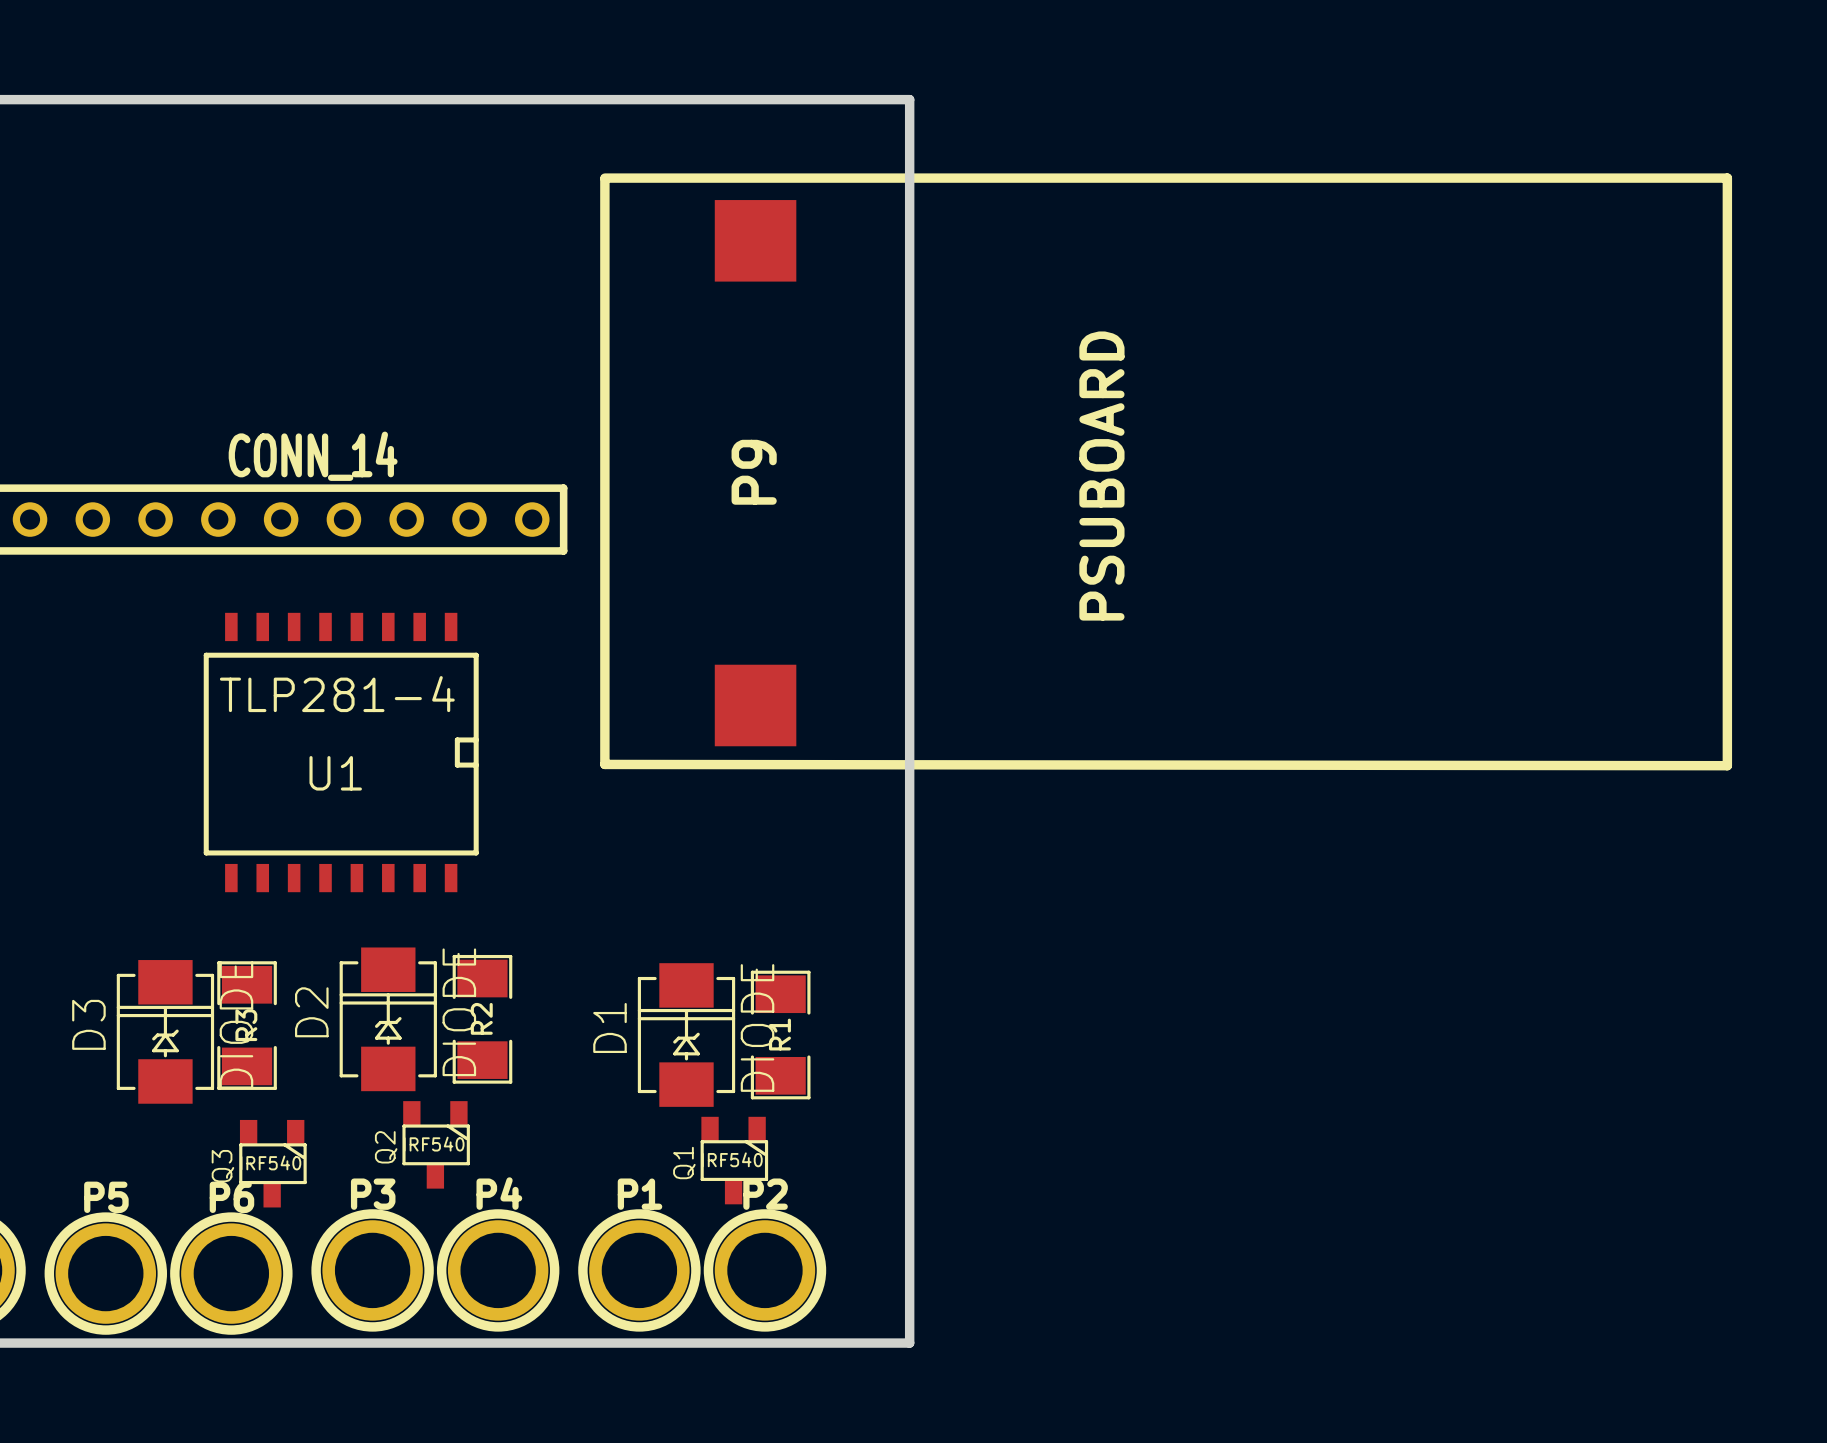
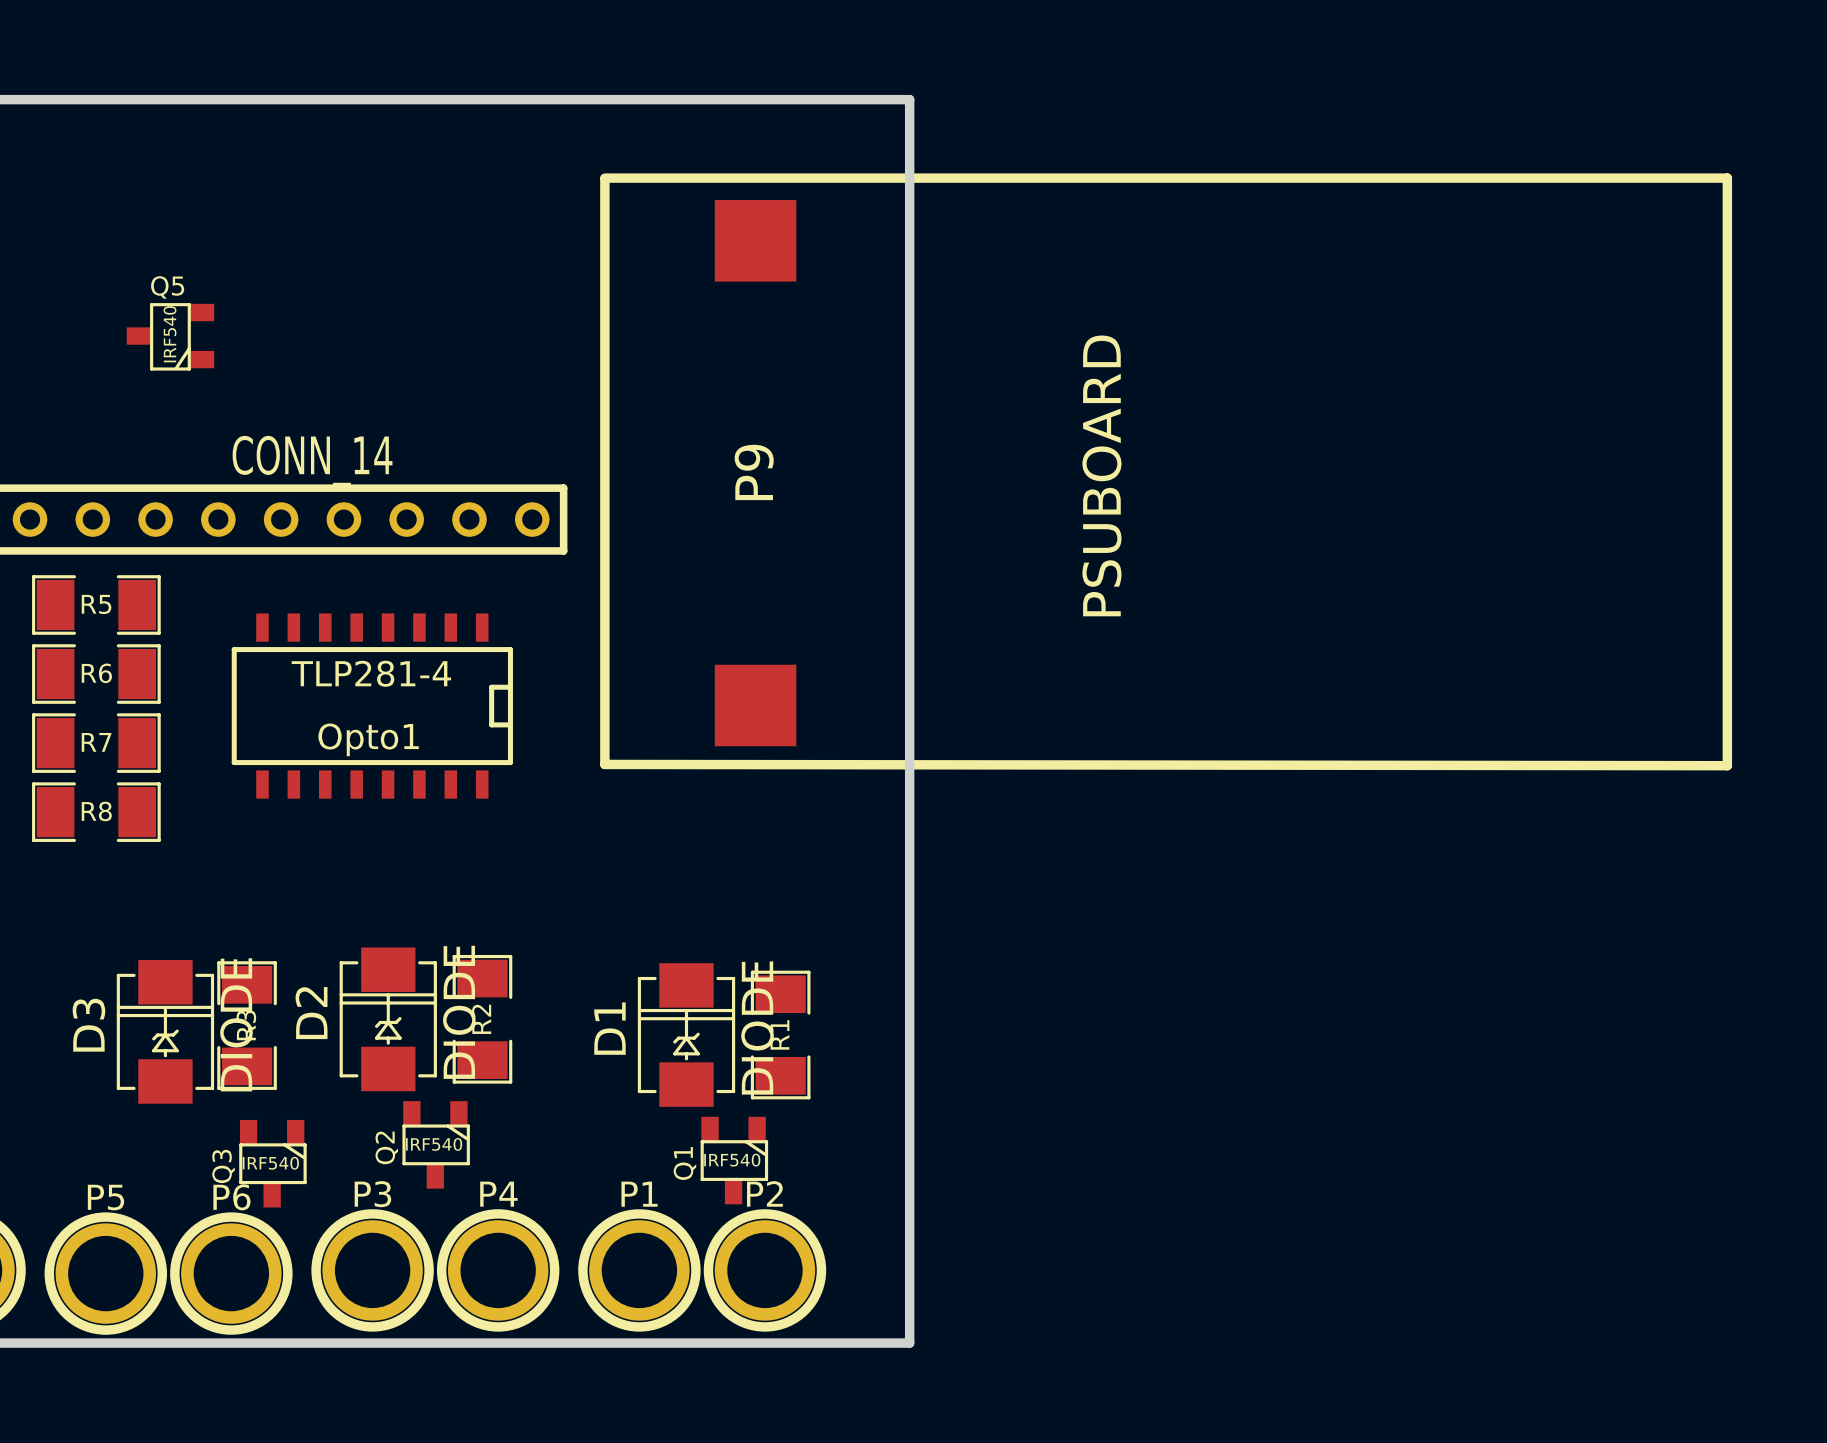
Q5: none -> IRF540 (170, 336)
R5: none -> (96, 604)
R6: none -> (96, 674)
Opto1: none -> TLP281-4 (372, 706)
R7: none -> (96, 743)
U1: TLP281-4 (341, 752) -> none
R8: none -> (96, 812)

